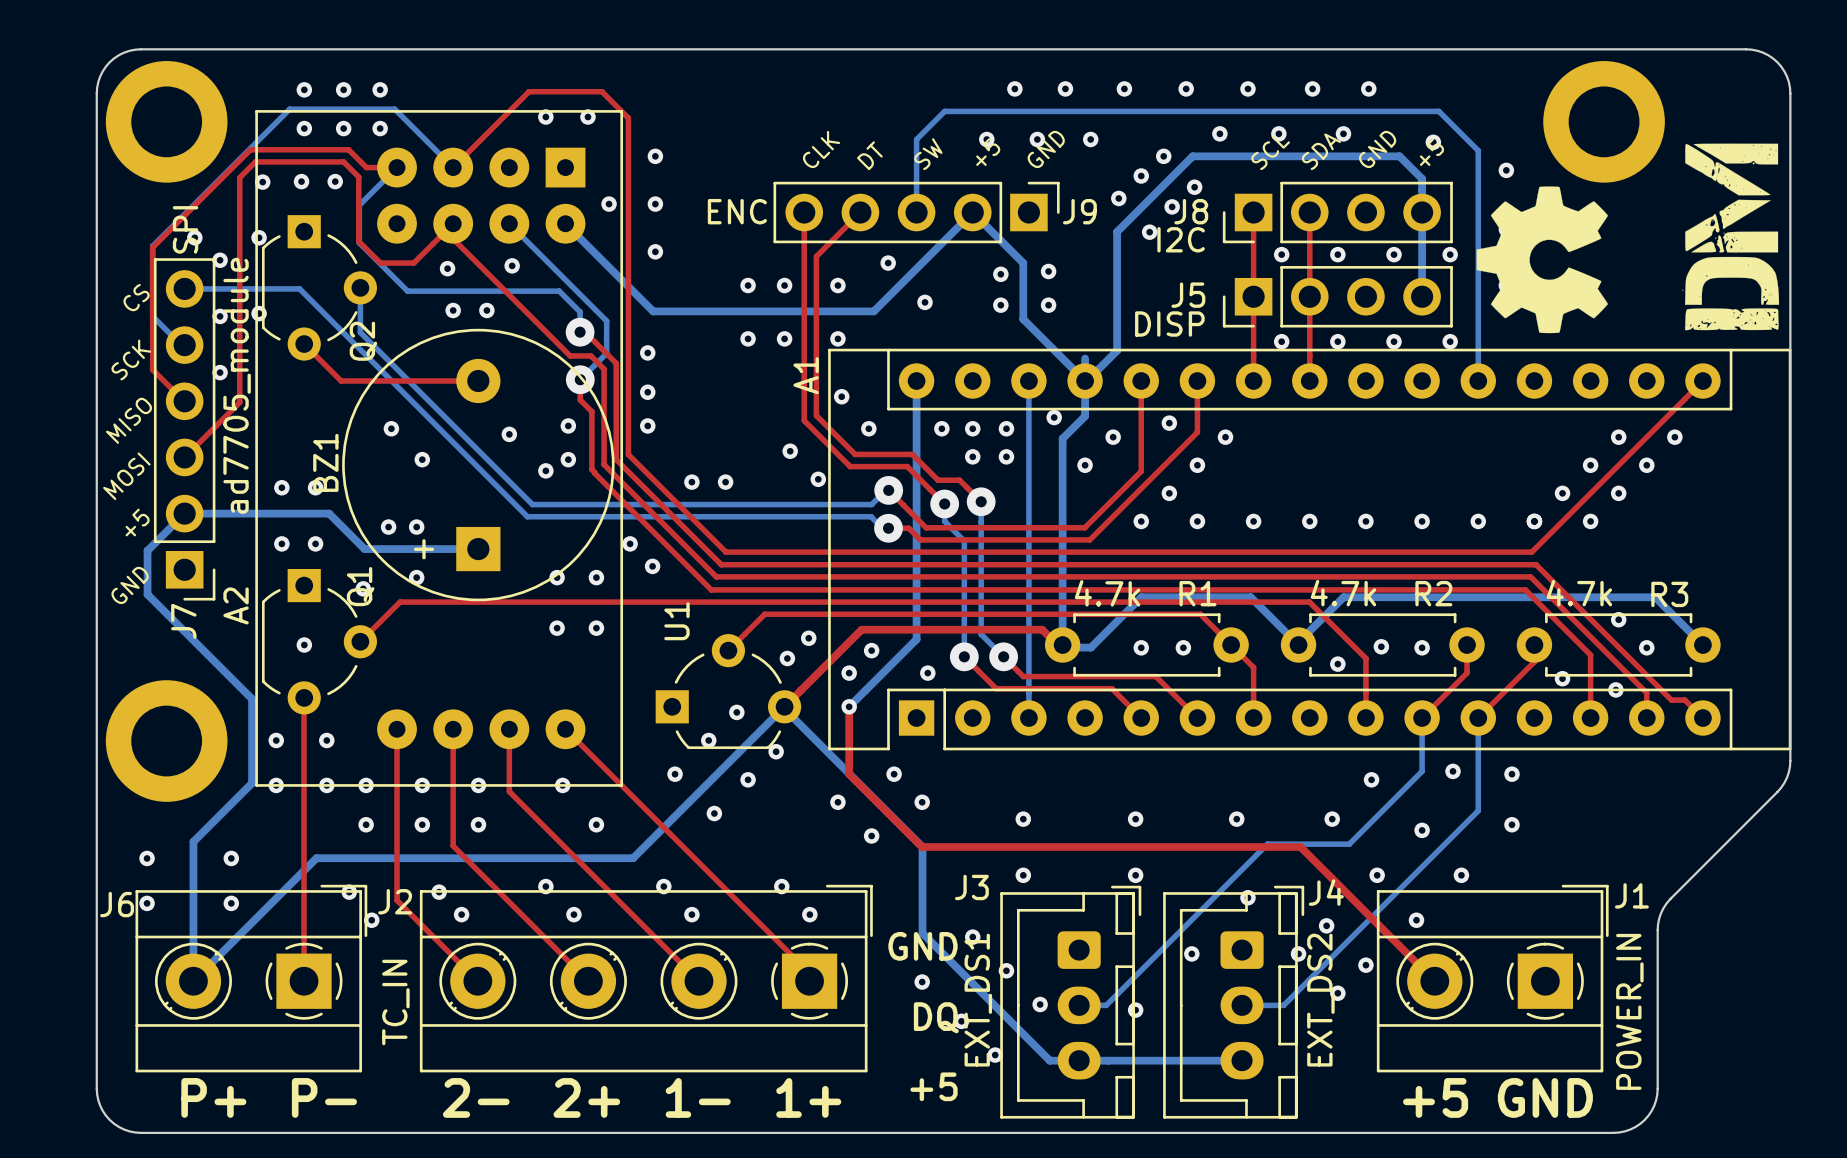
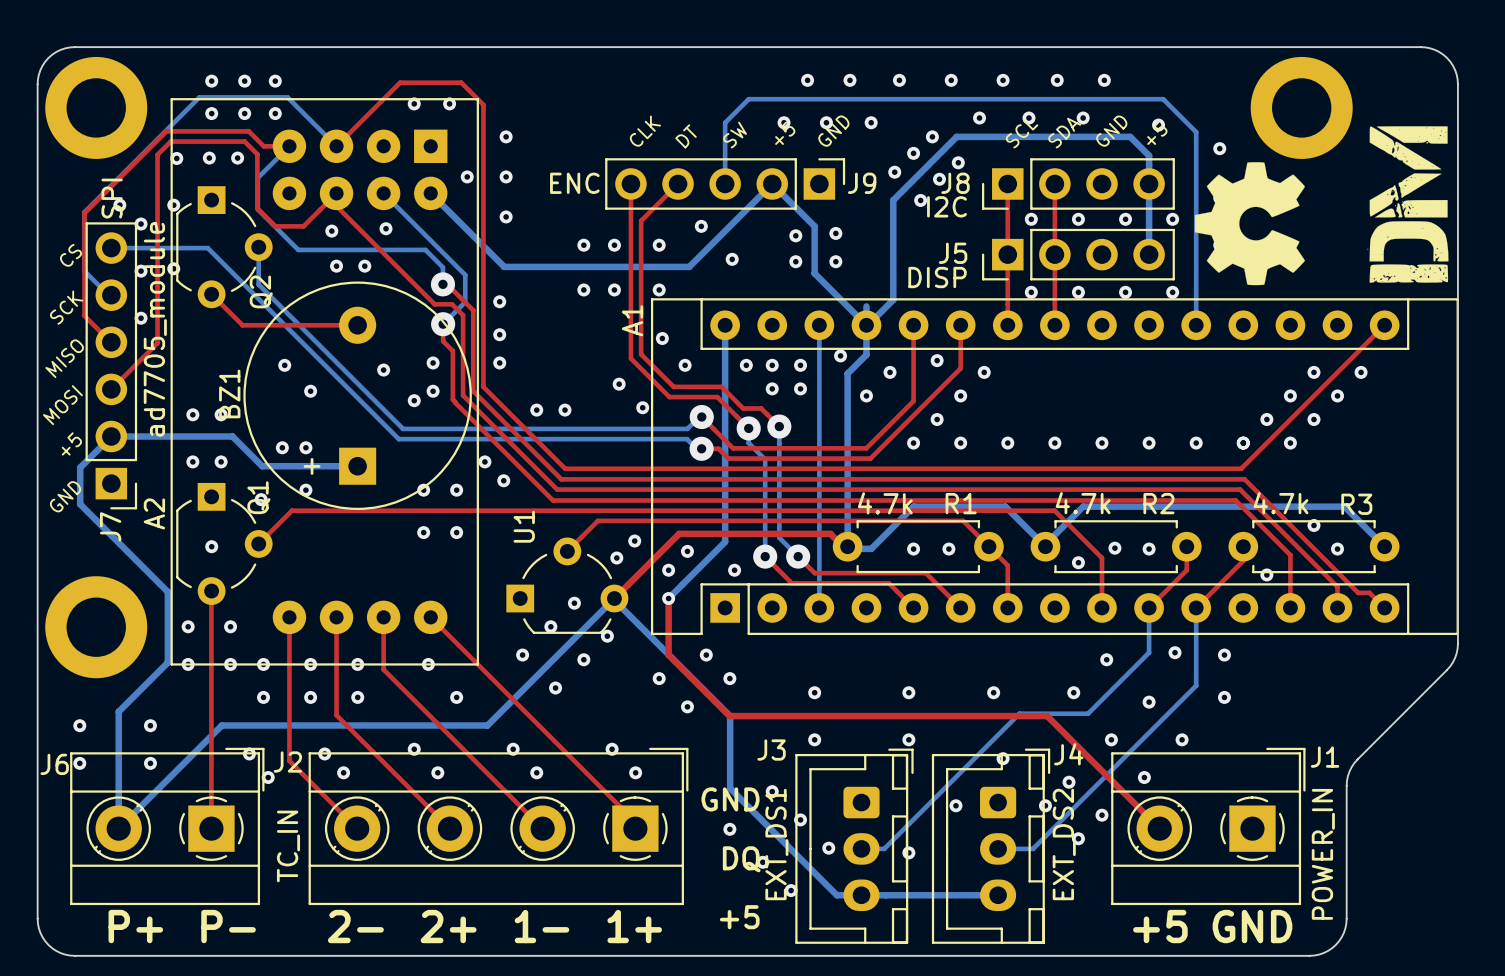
via: (1615, 689) -> none

